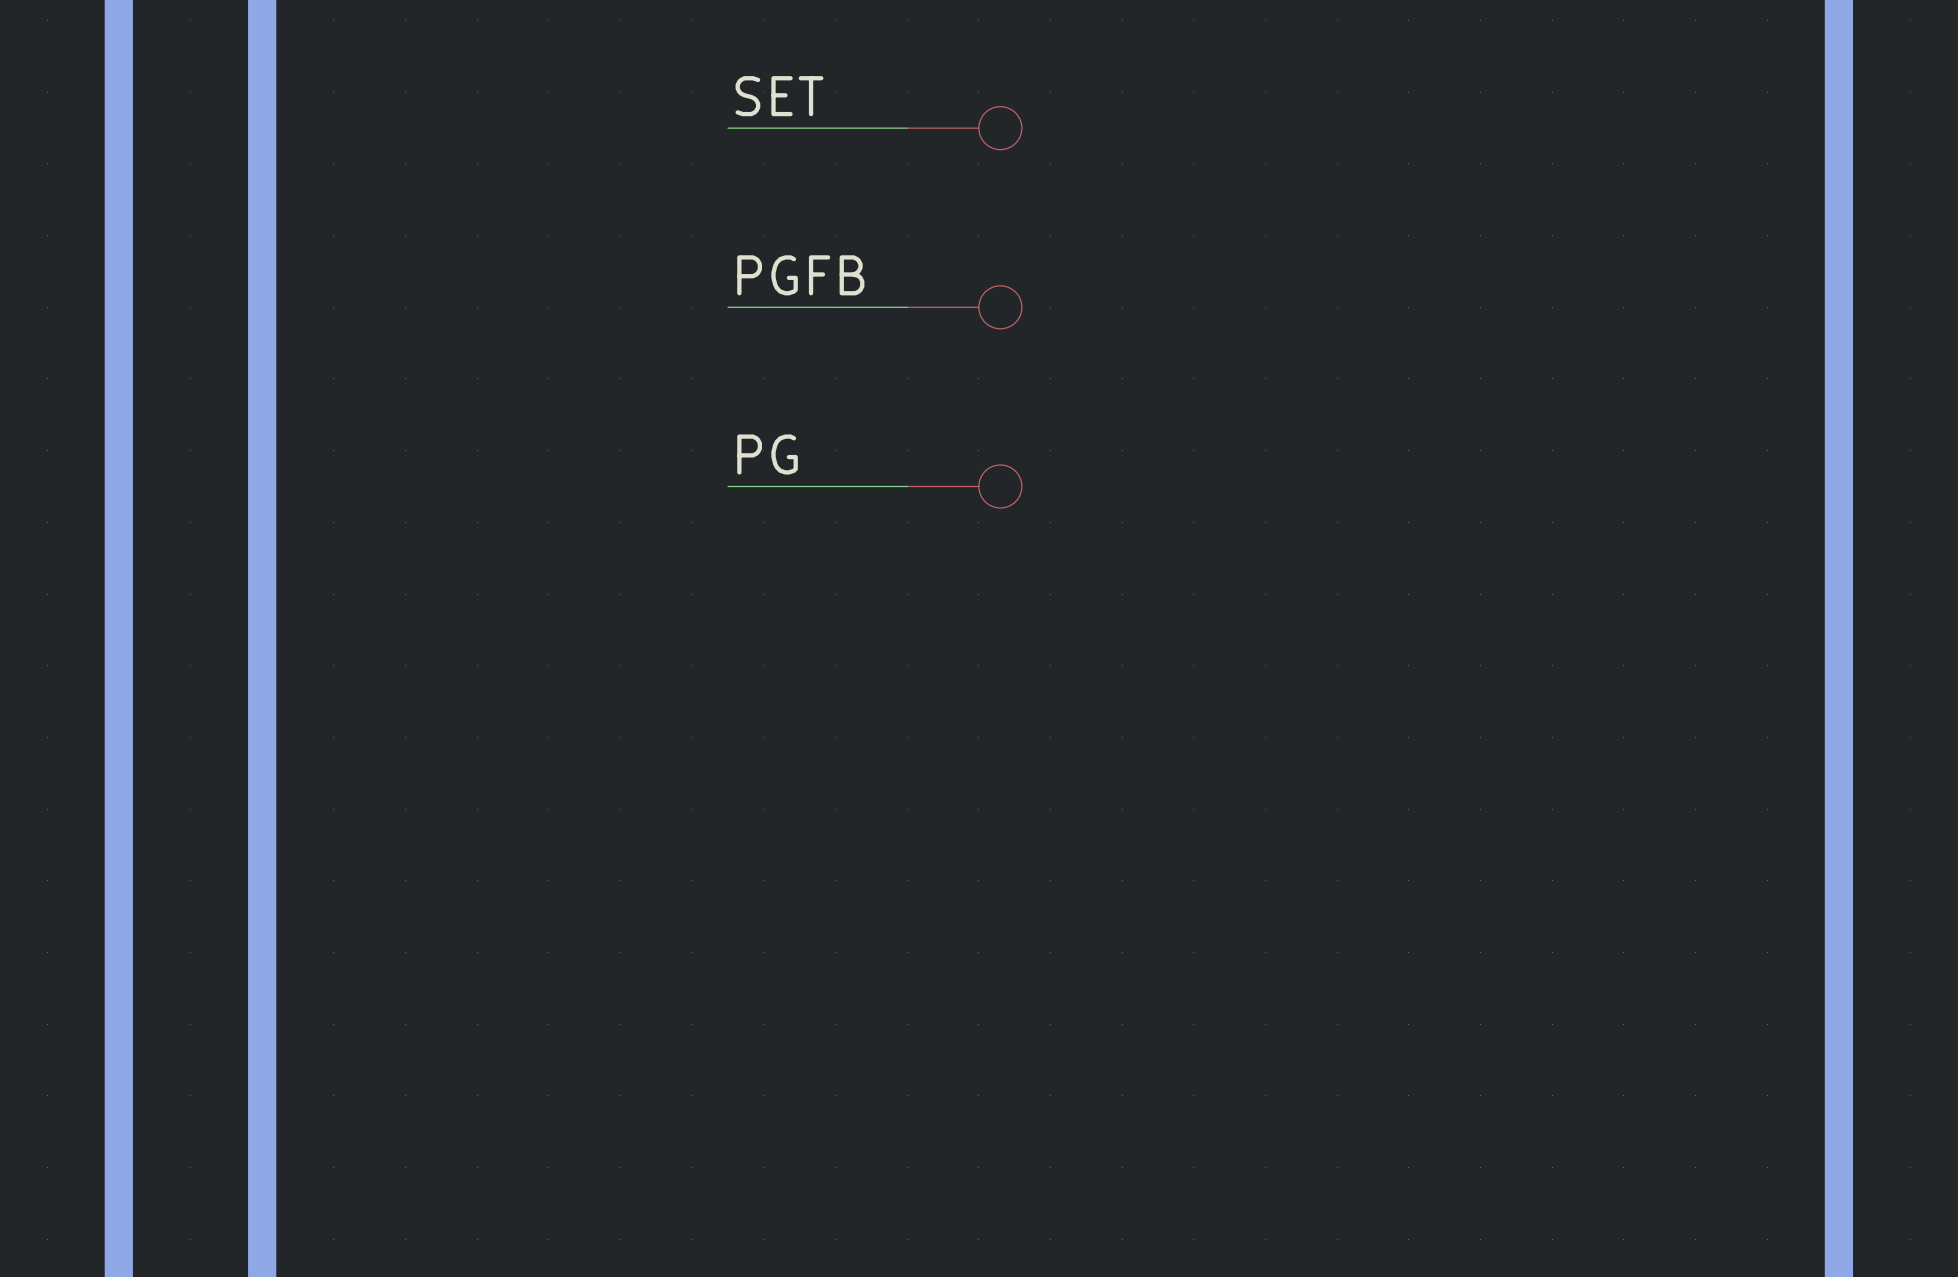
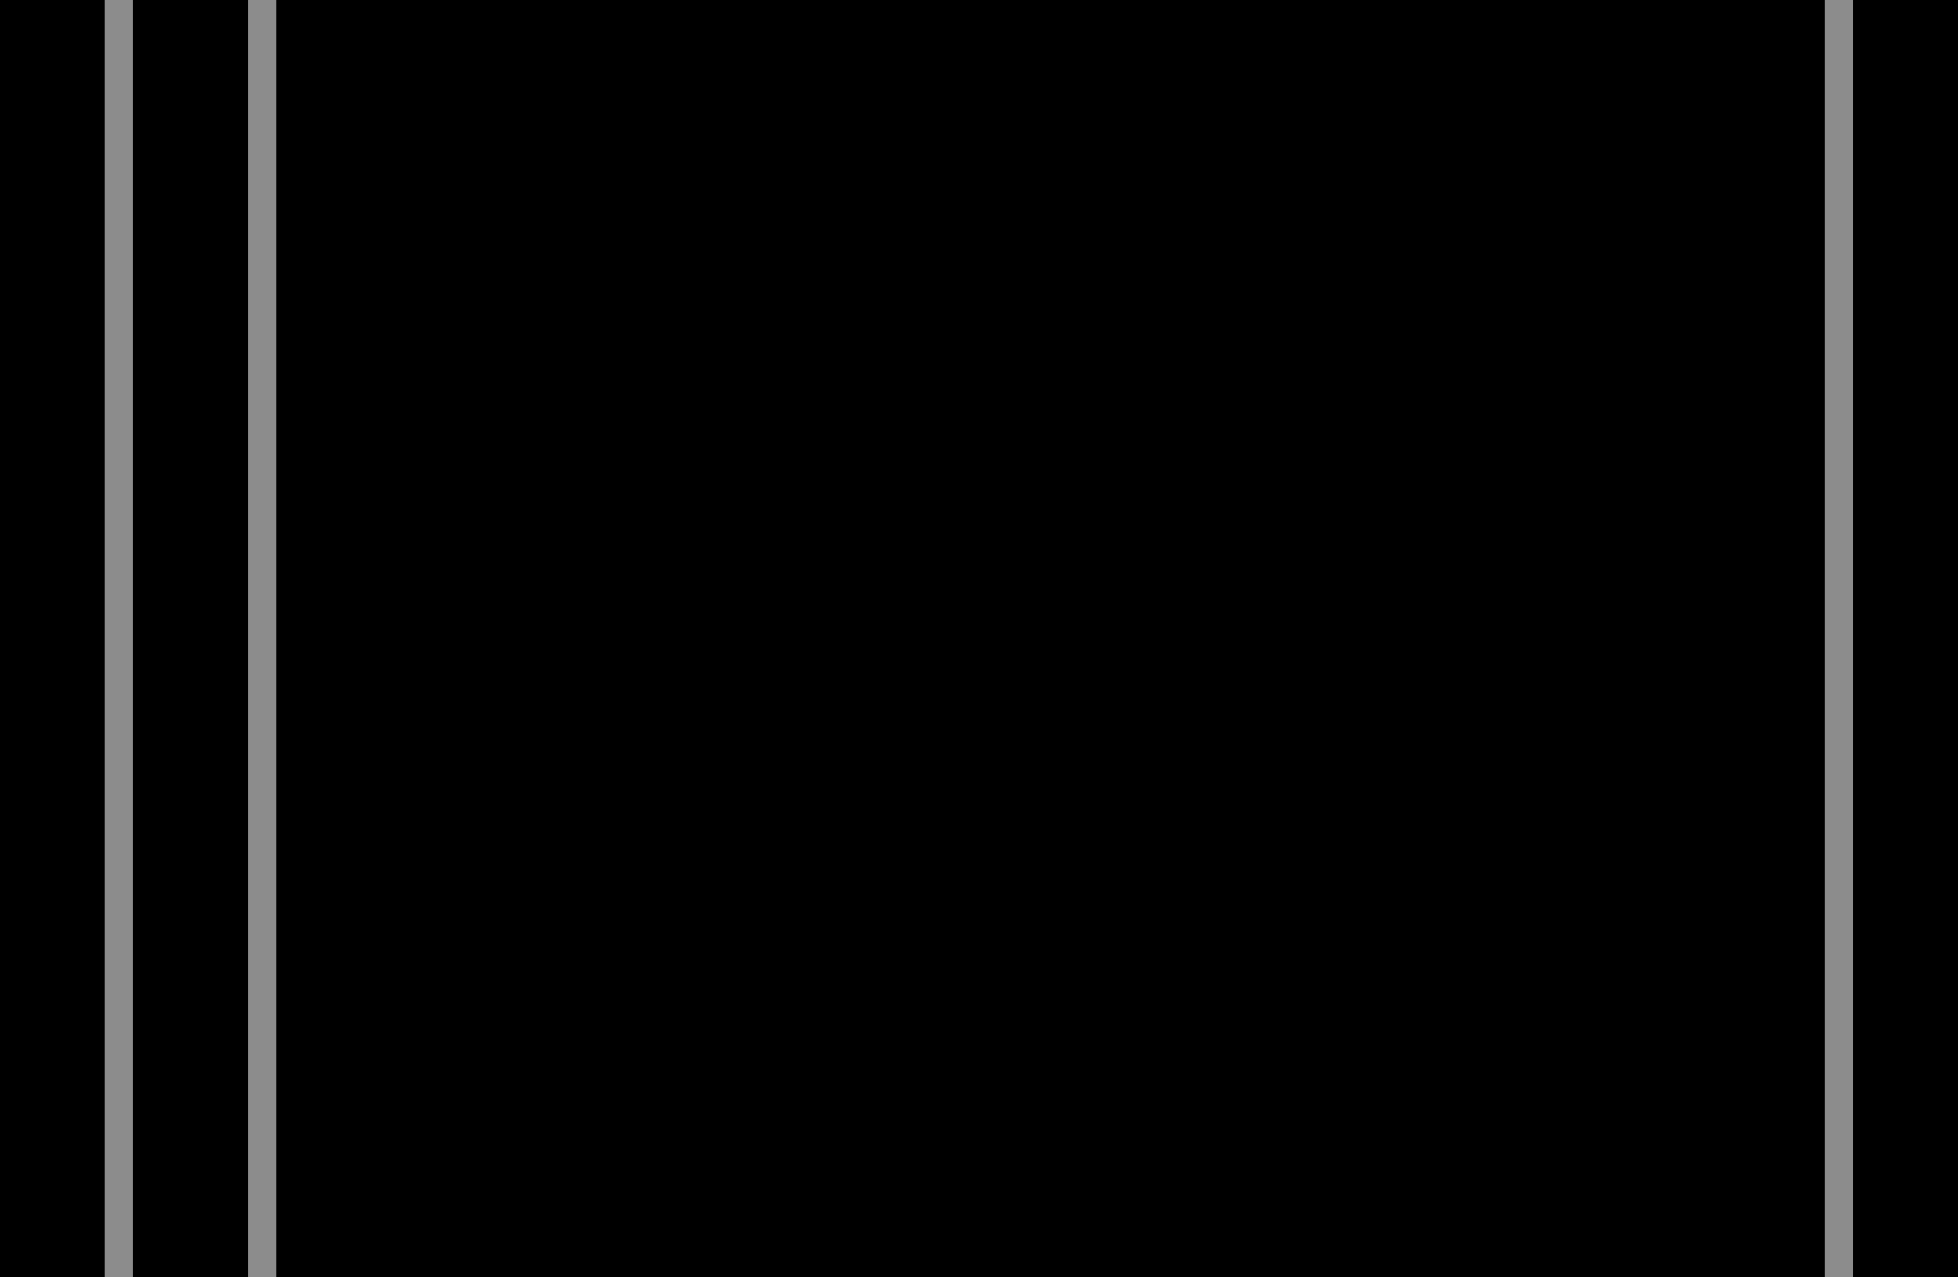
label: SET (779, 96) -> none
wire: (728, 128) (907, 128) -> none
part: (964, 128) -> none
label: PGFB (800, 275) -> none
wire: (728, 307) (907, 307) -> none
part: (964, 307) -> none
label: PG (767, 454) -> none
wire: (728, 486) (907, 486) -> none
part: (964, 486) -> none

